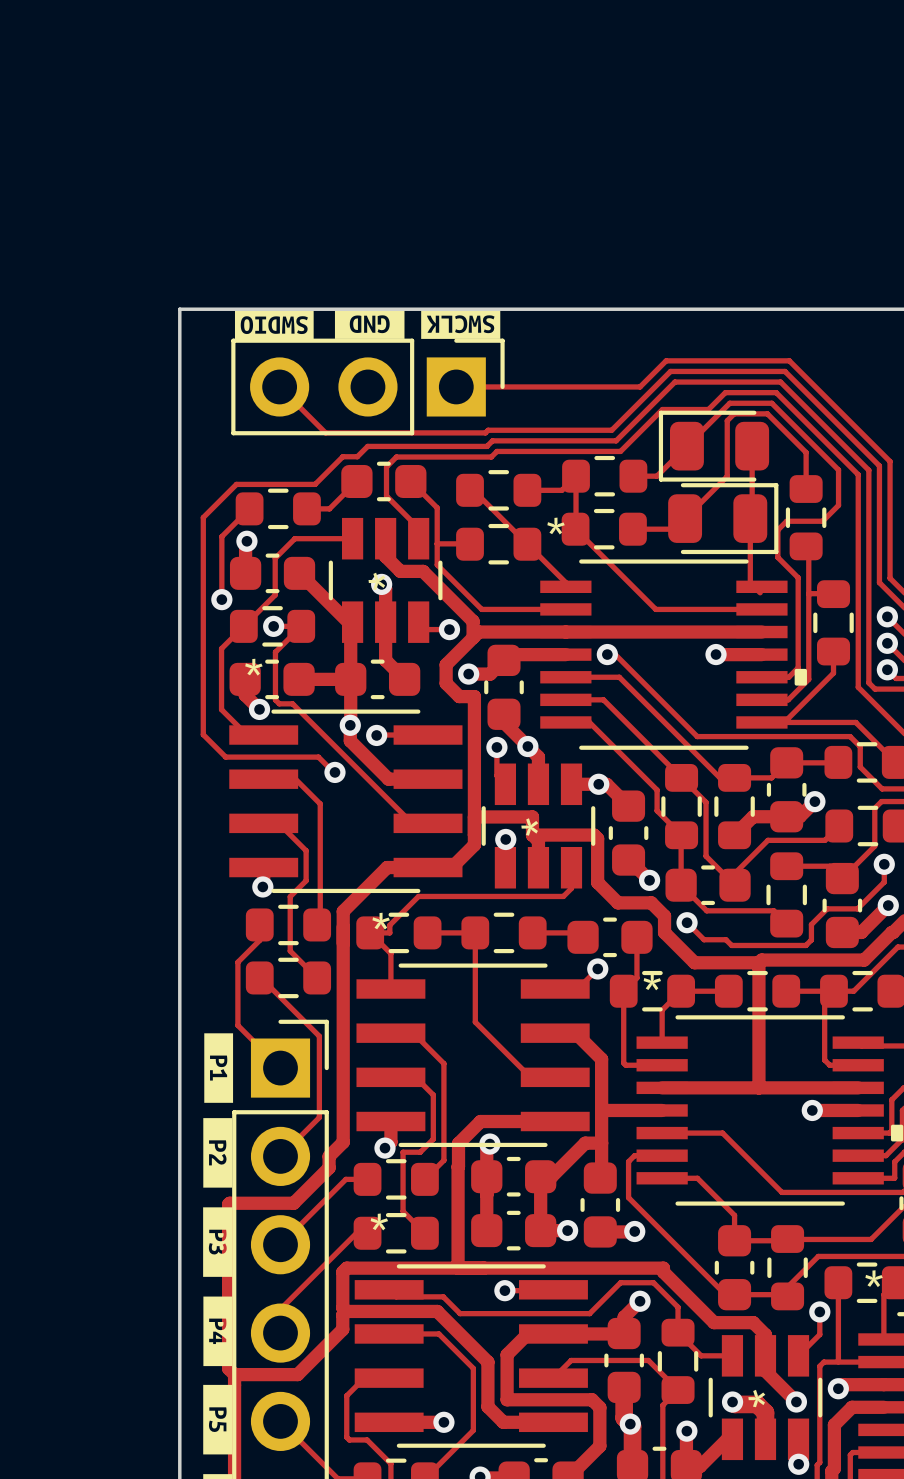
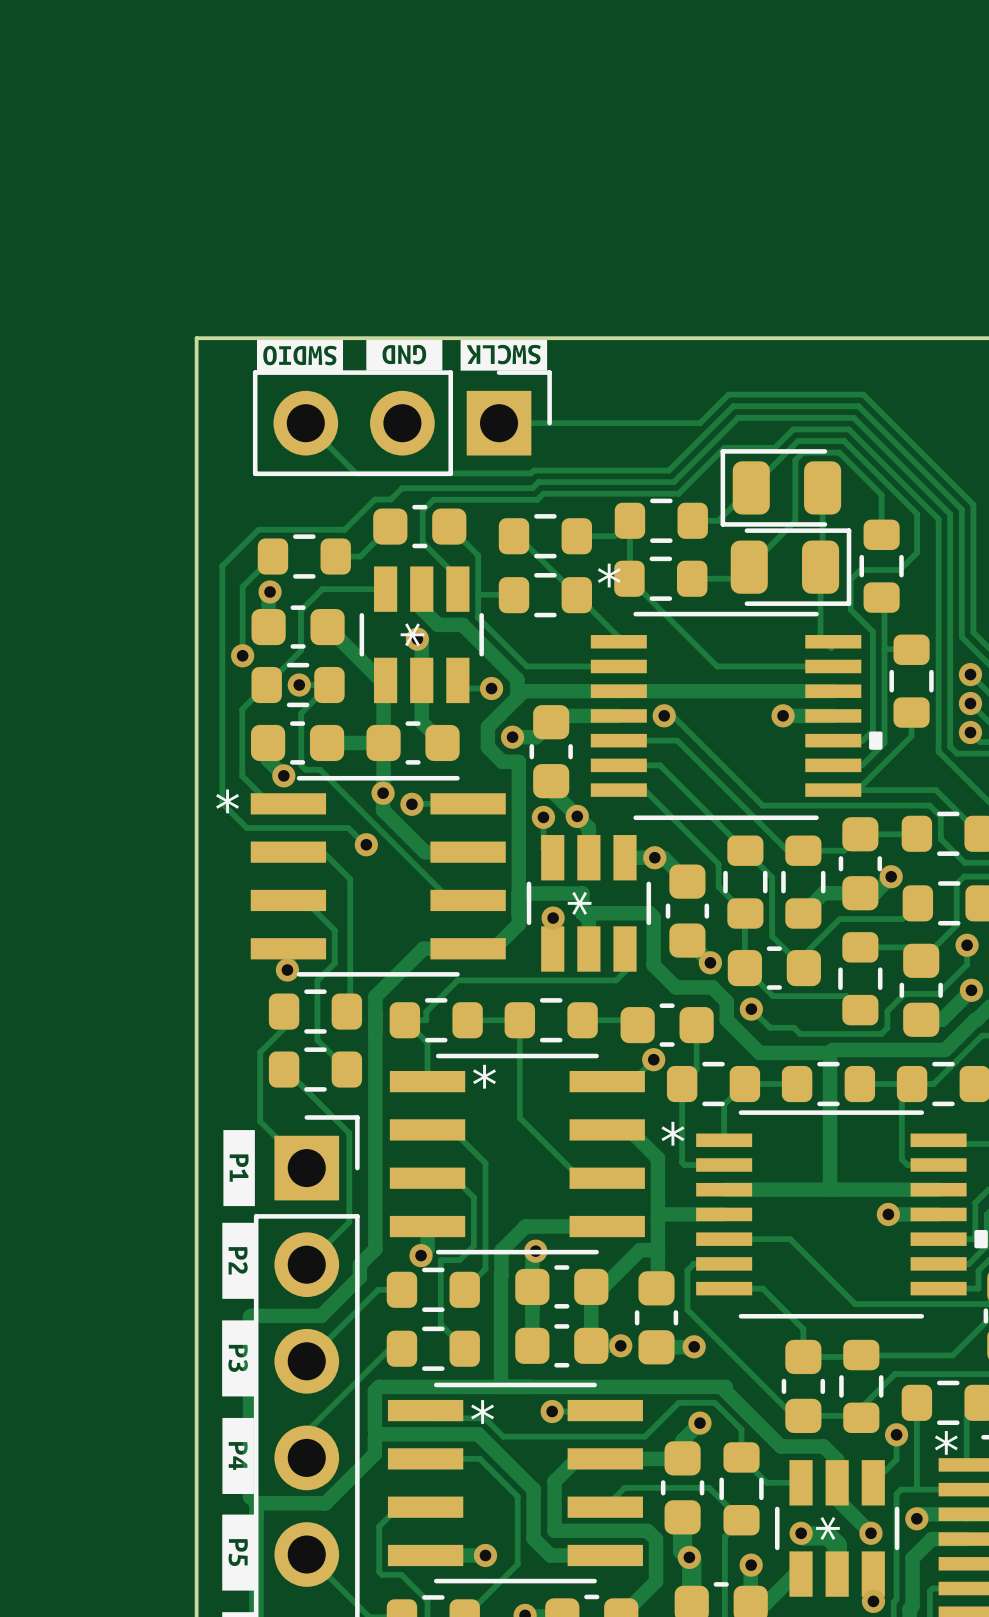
part text position: * (253, 667) -> * (227, 801)
part text position: * (381, 921) -> * (484, 1076)
part text position: * (652, 981) -> * (672, 1133)
part text position: * (379, 1221) -> * (482, 1411)
part text position: * (874, 1278) -> * (946, 1442)

